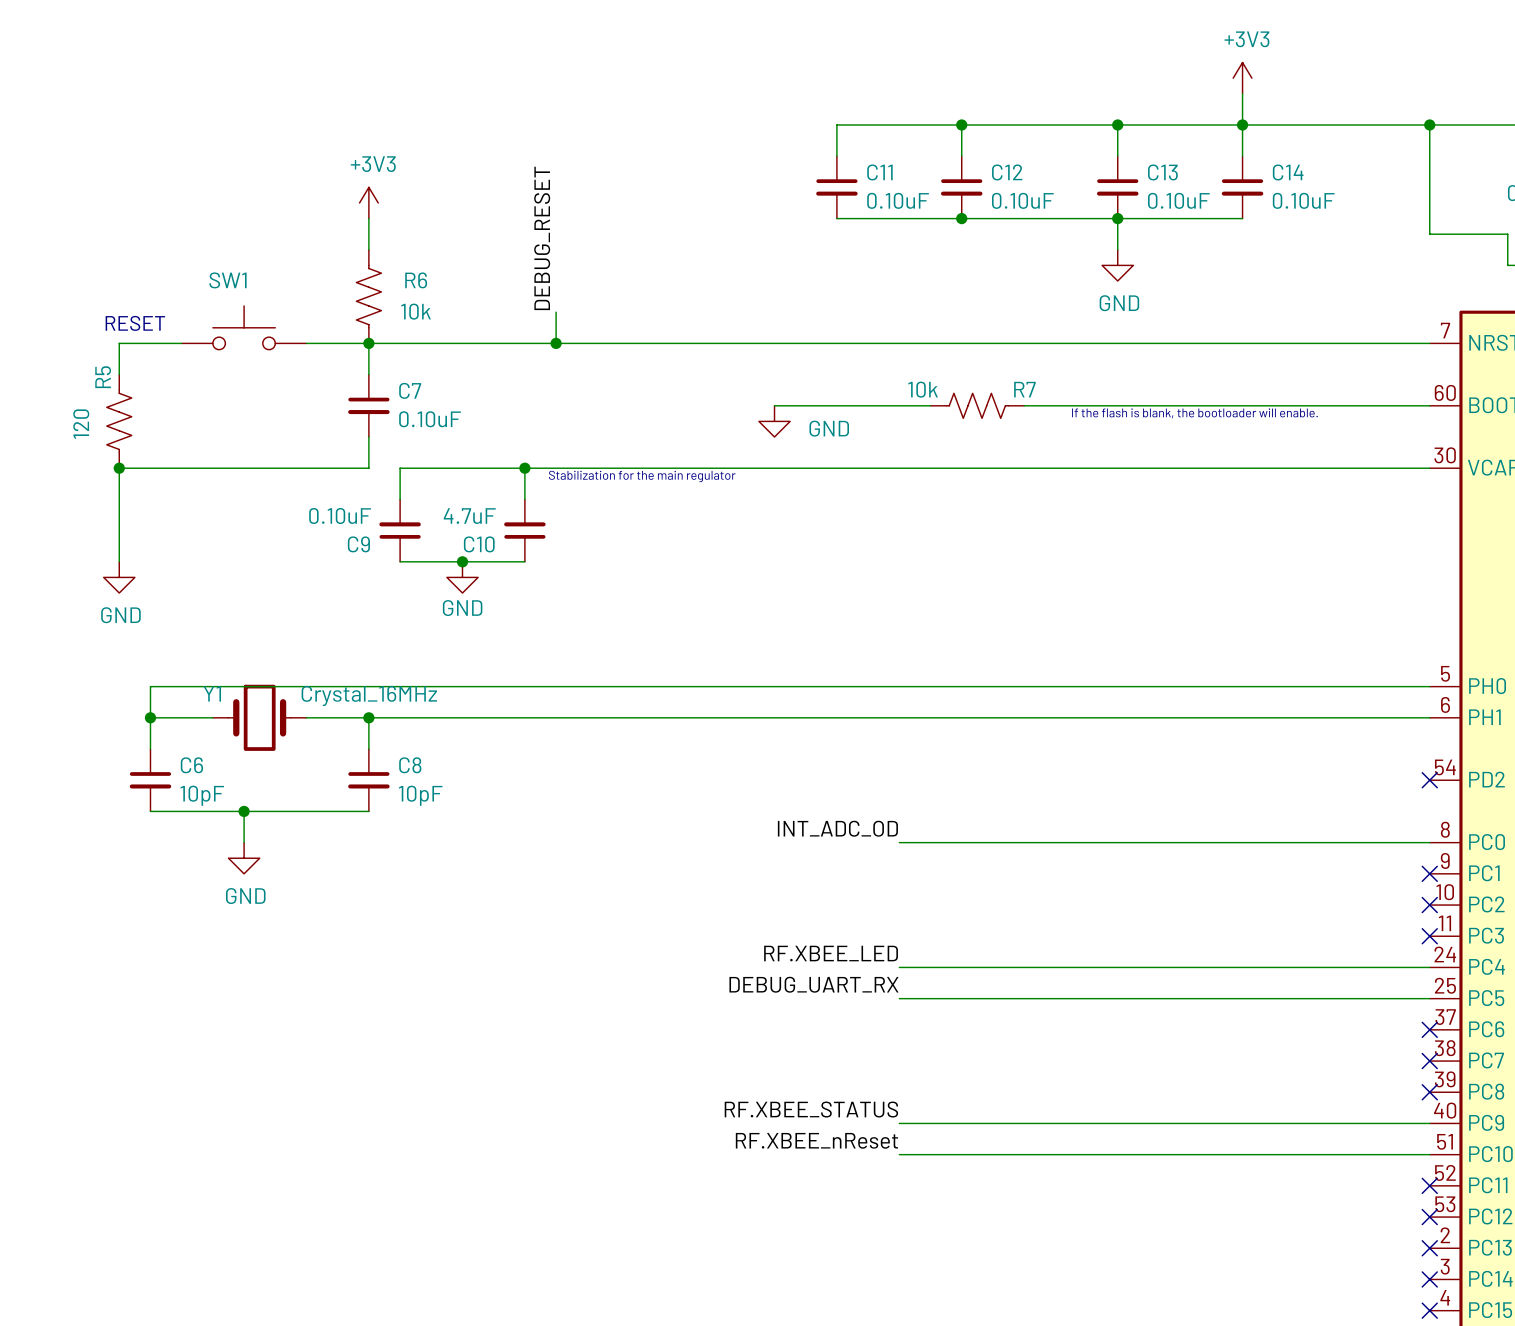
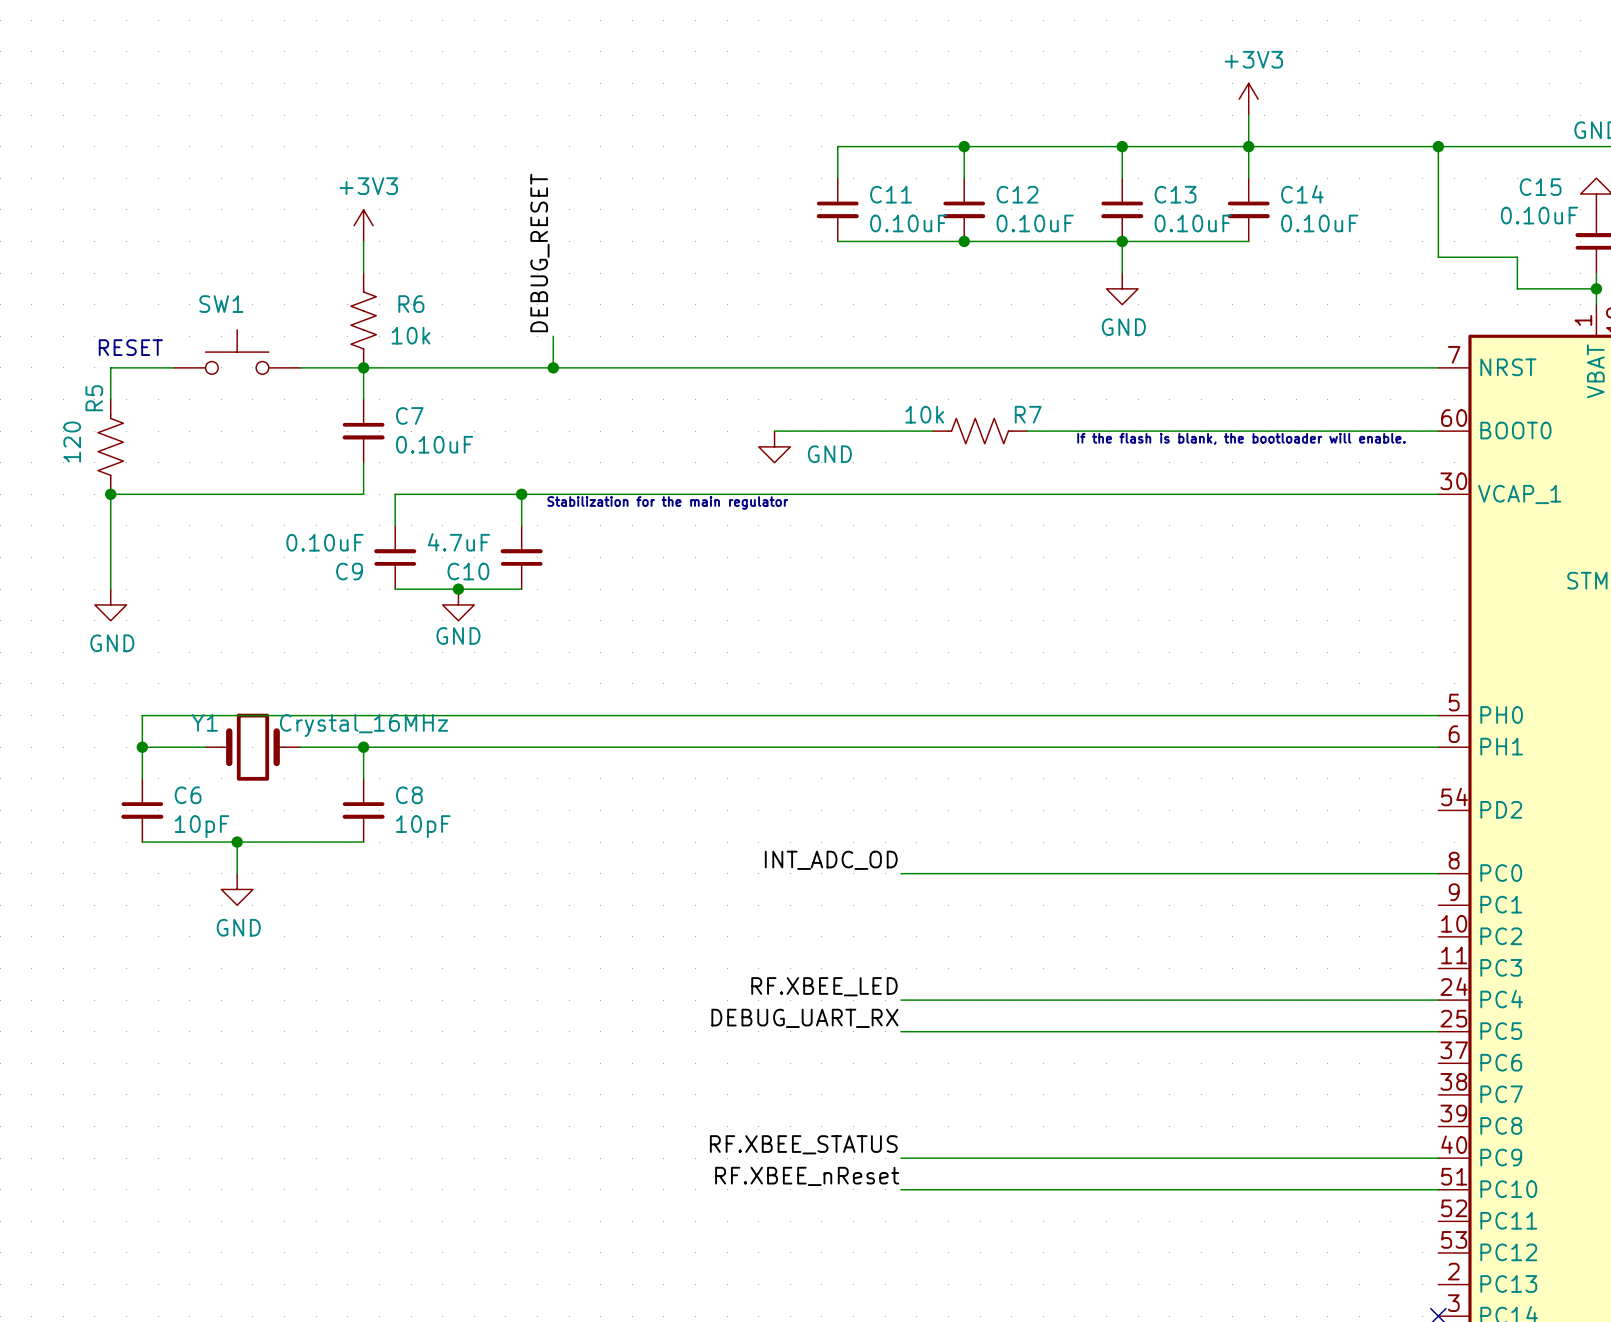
no-connect mark: (1429, 780) -> none
no-connect mark: (1429, 873) -> none
no-connect mark: (1429, 905) -> none
no-connect mark: (1429, 936) -> none
no-connect mark: (1429, 1029) -> none
no-connect mark: (1429, 1061) -> none
no-connect mark: (1429, 1092) -> none
no-connect mark: (1429, 1185) -> none
no-connect mark: (1429, 1217) -> none
no-connect mark: (1429, 1248) -> none

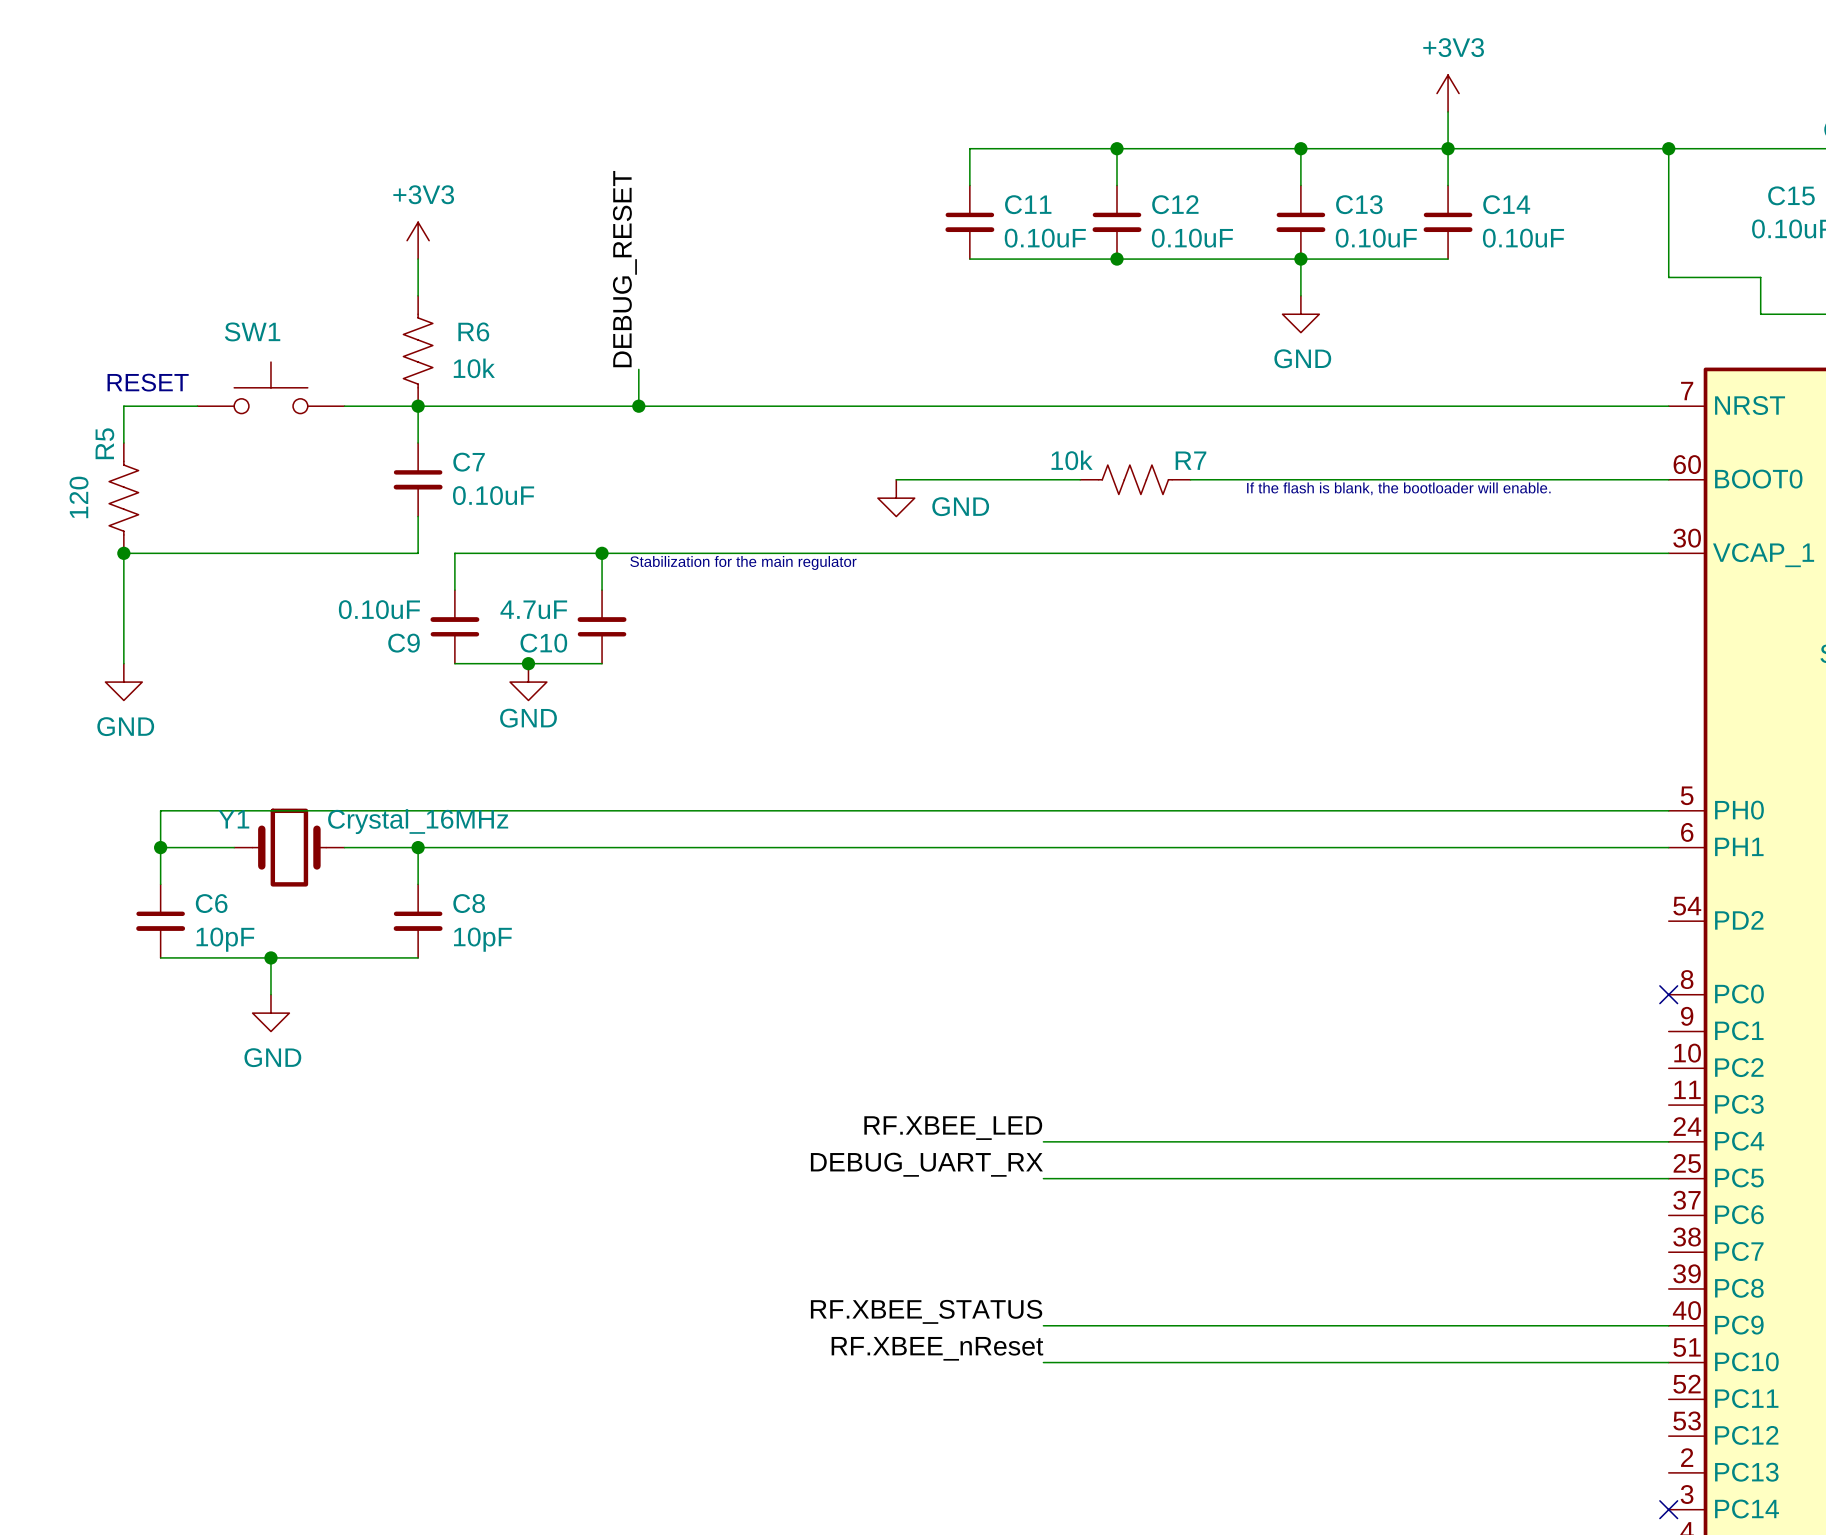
label: INT_ADC_OD (831, 860) -> none
wire: (900, 873) (1438, 873) -> none
no-connect mark: none -> (1668, 994)

